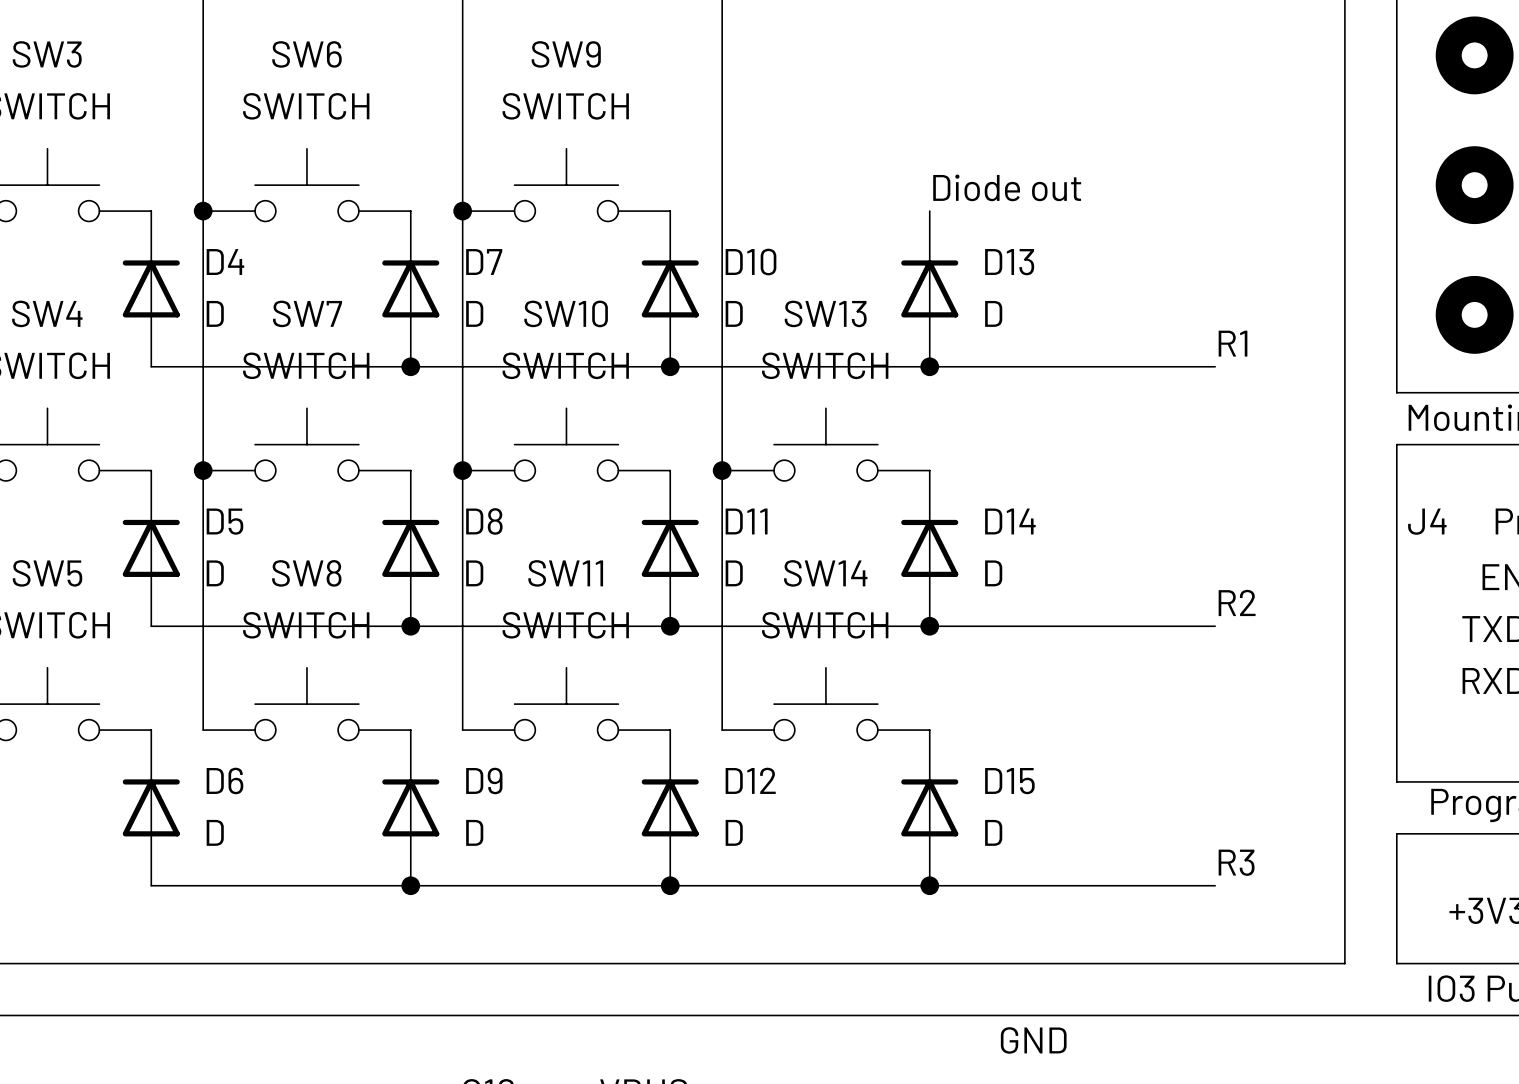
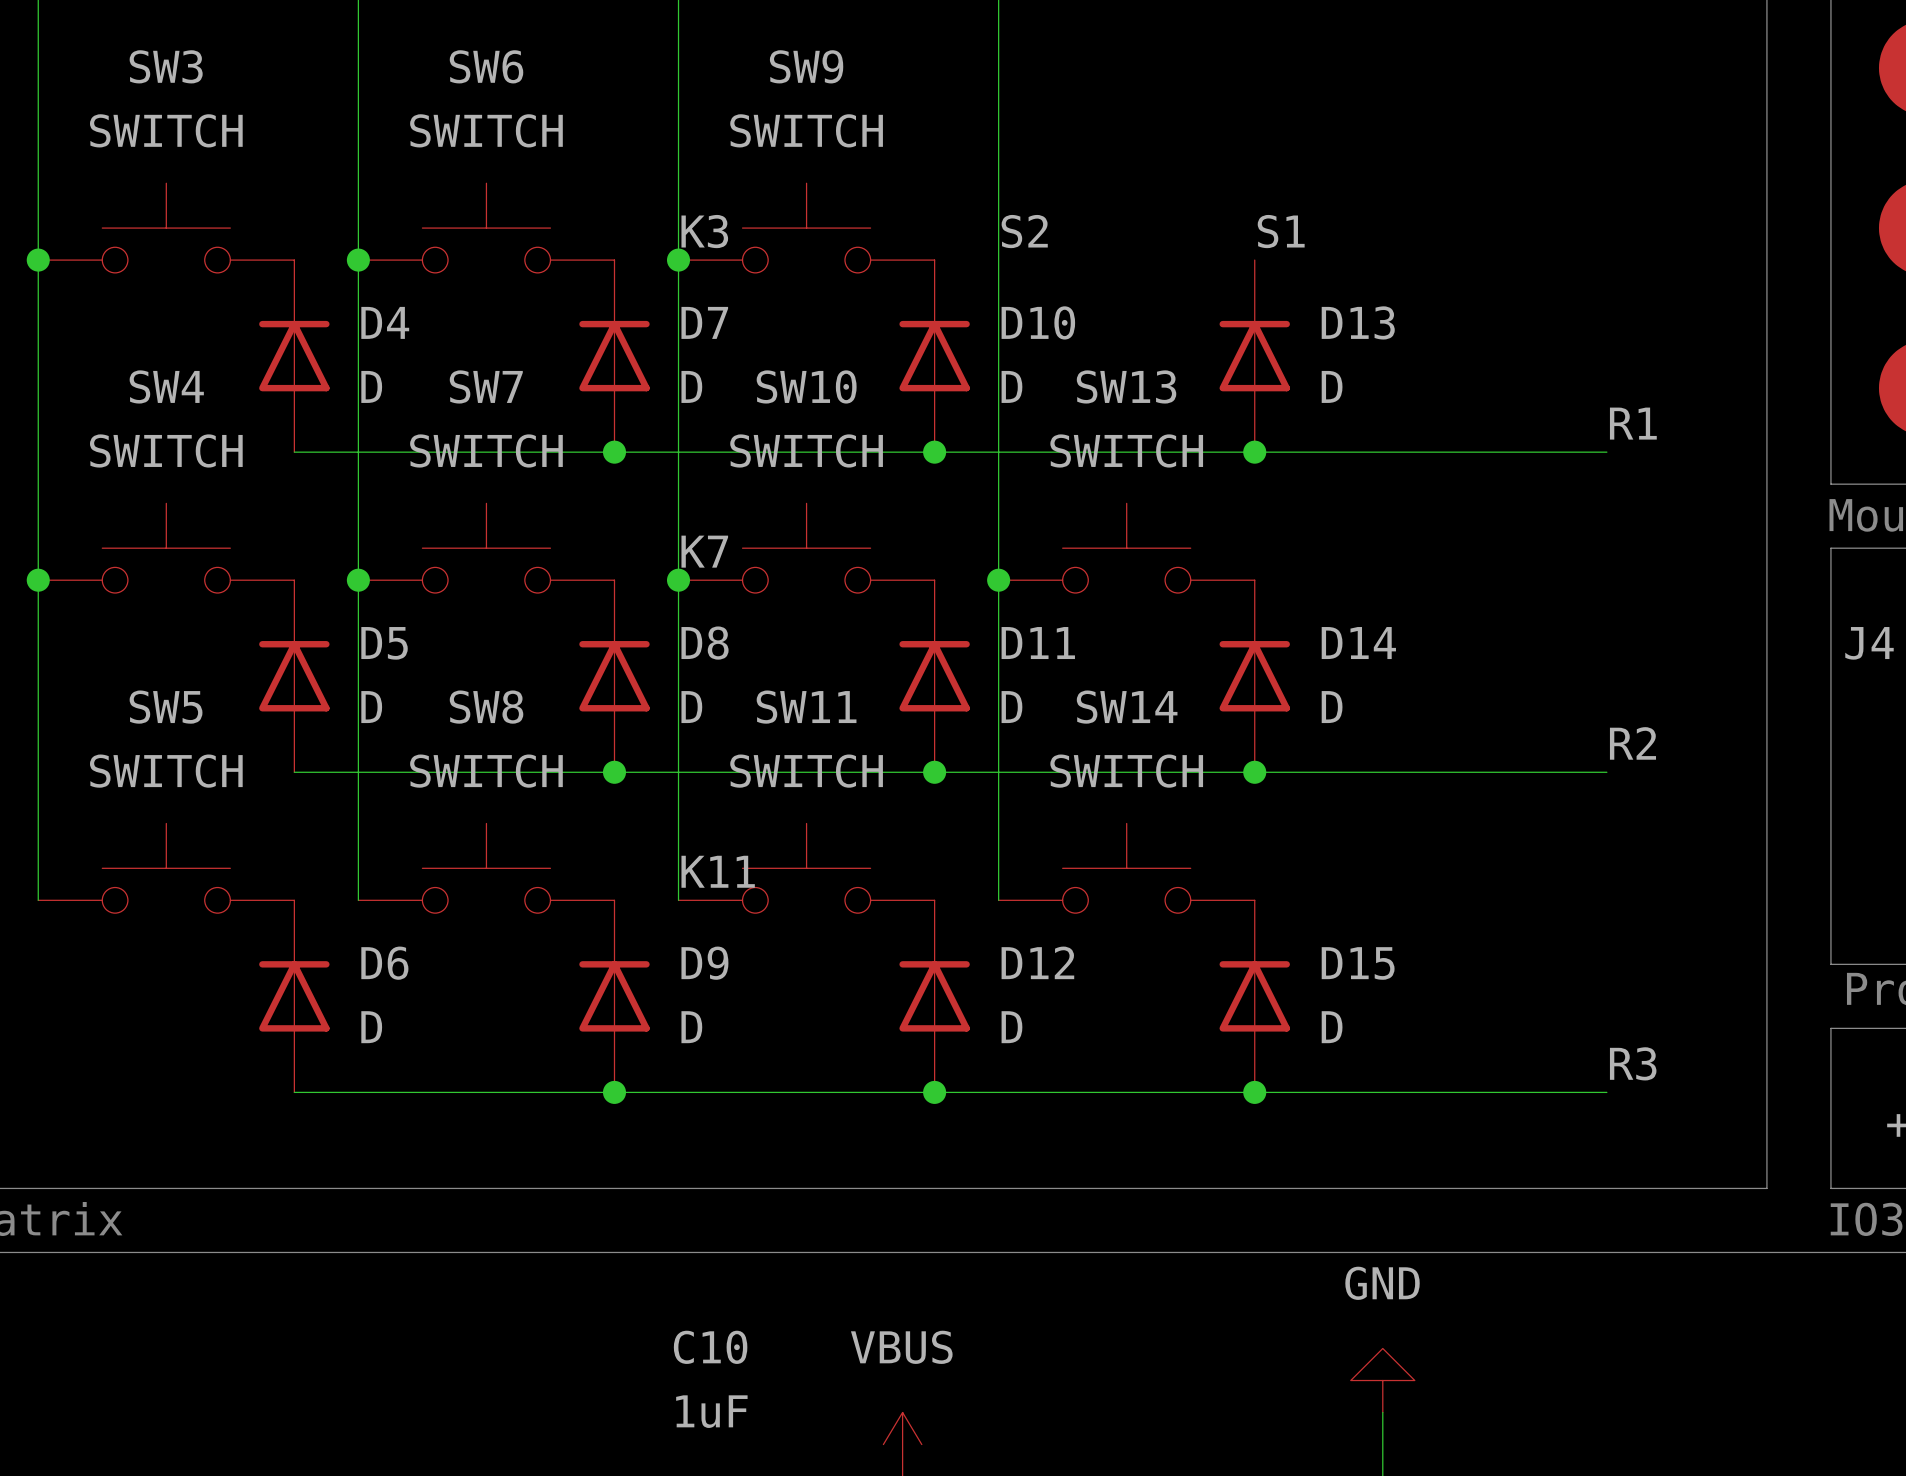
label: none -> S2 (1024, 231)
label: Diode out (1007, 187) -> S1 (1281, 231)
label: none -> K3 (704, 231)
label: none -> K7 (704, 551)
label: none -> K11 (718, 871)

